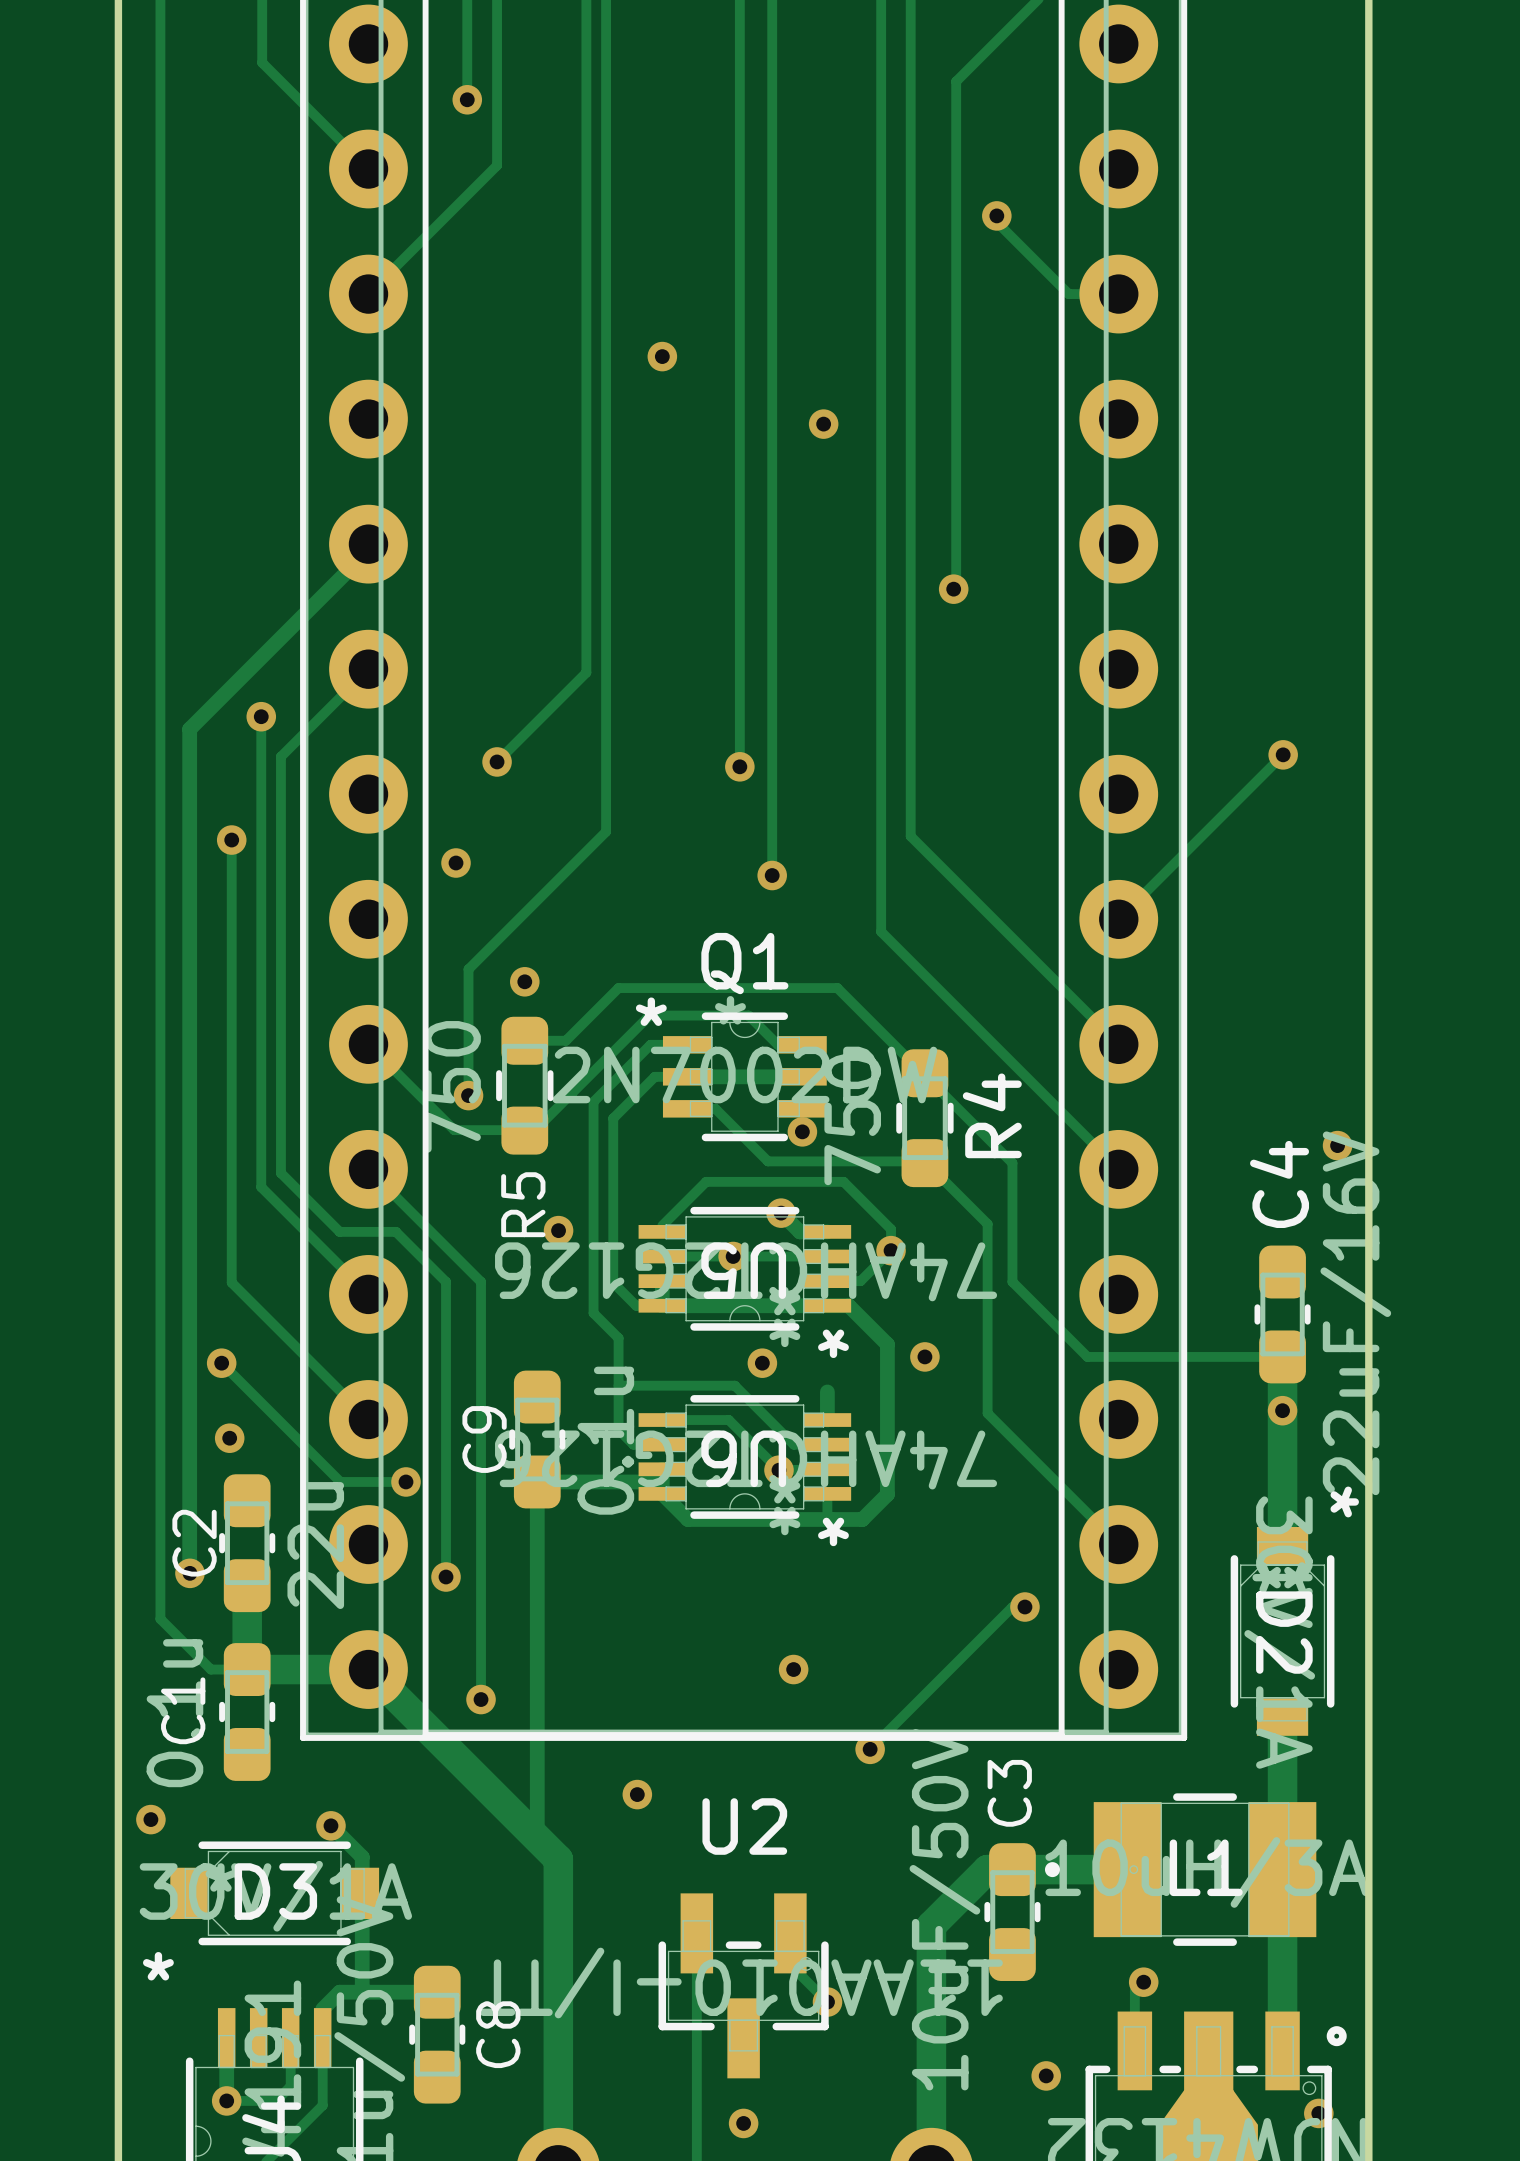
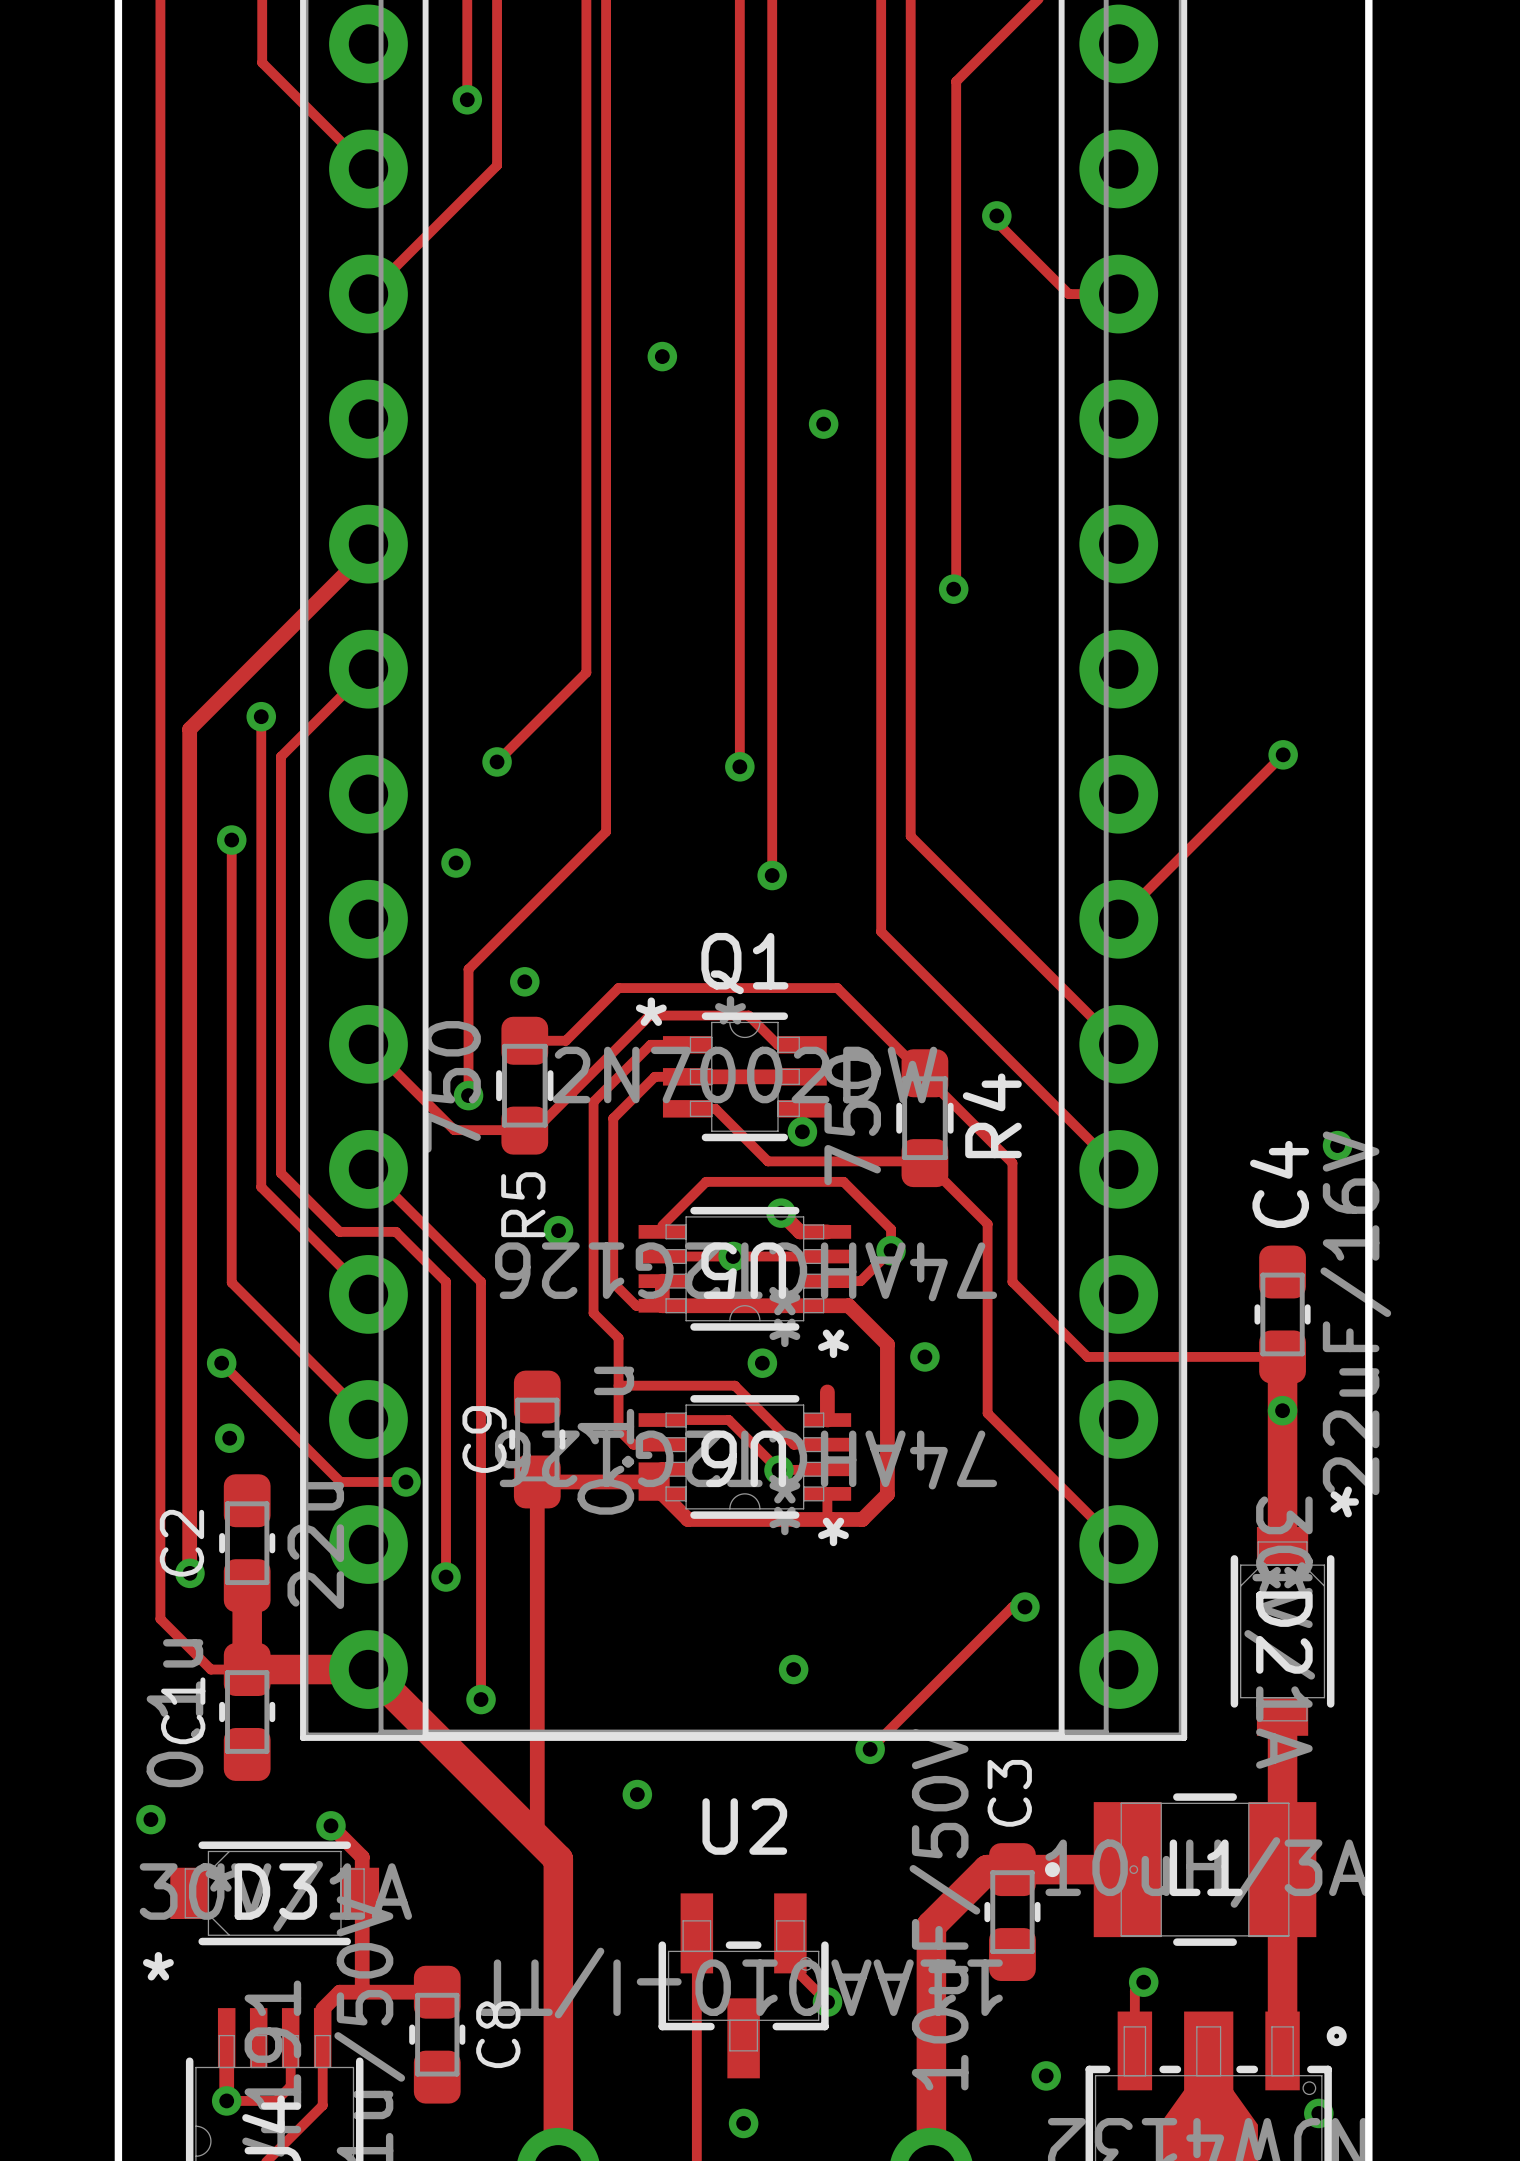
C2 name position: C2 (194, 1543) -> C2 (181, 1543)

